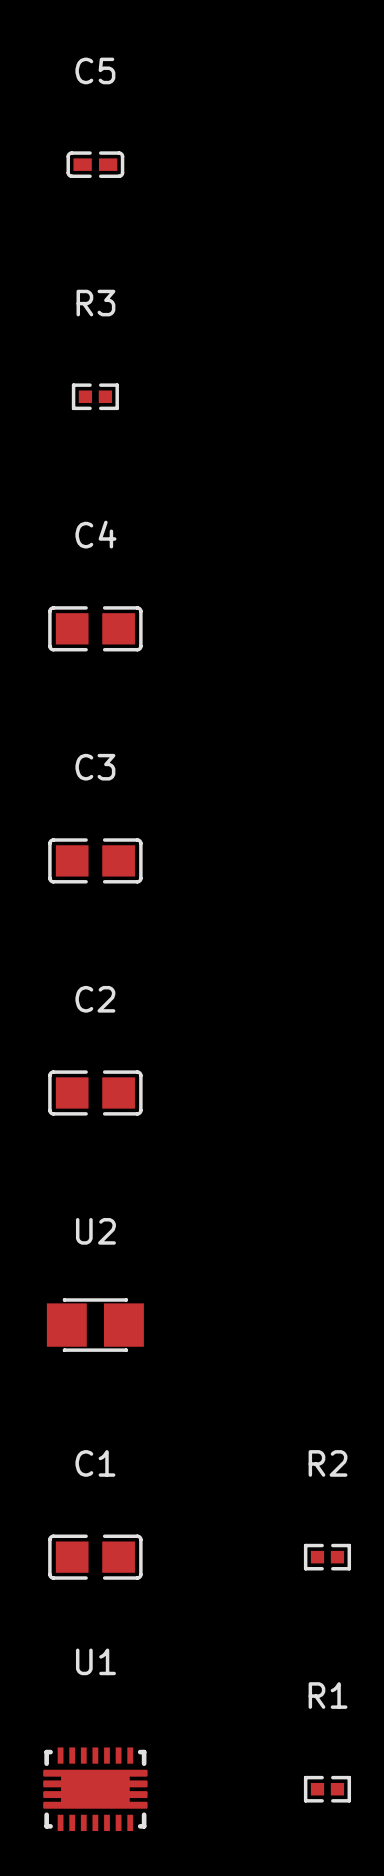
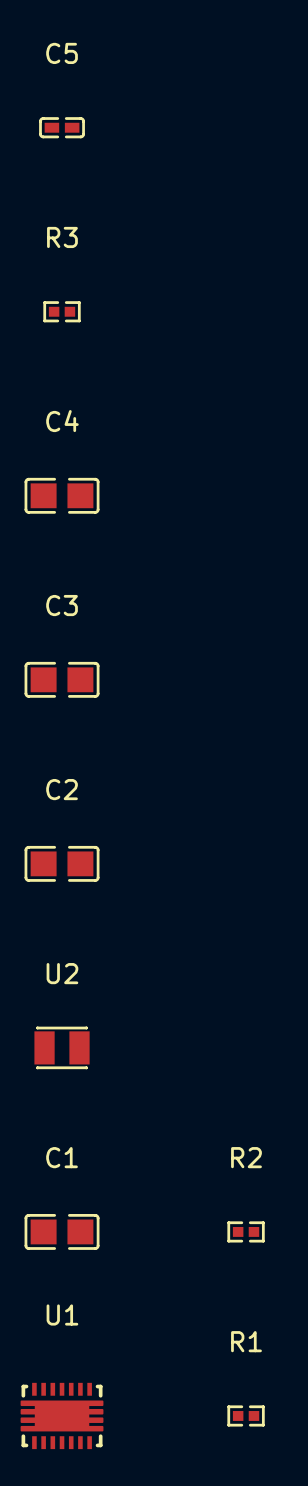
U2 footprint: [46, 1298, 144, 1353] -> [34, 1026, 90, 1070]

